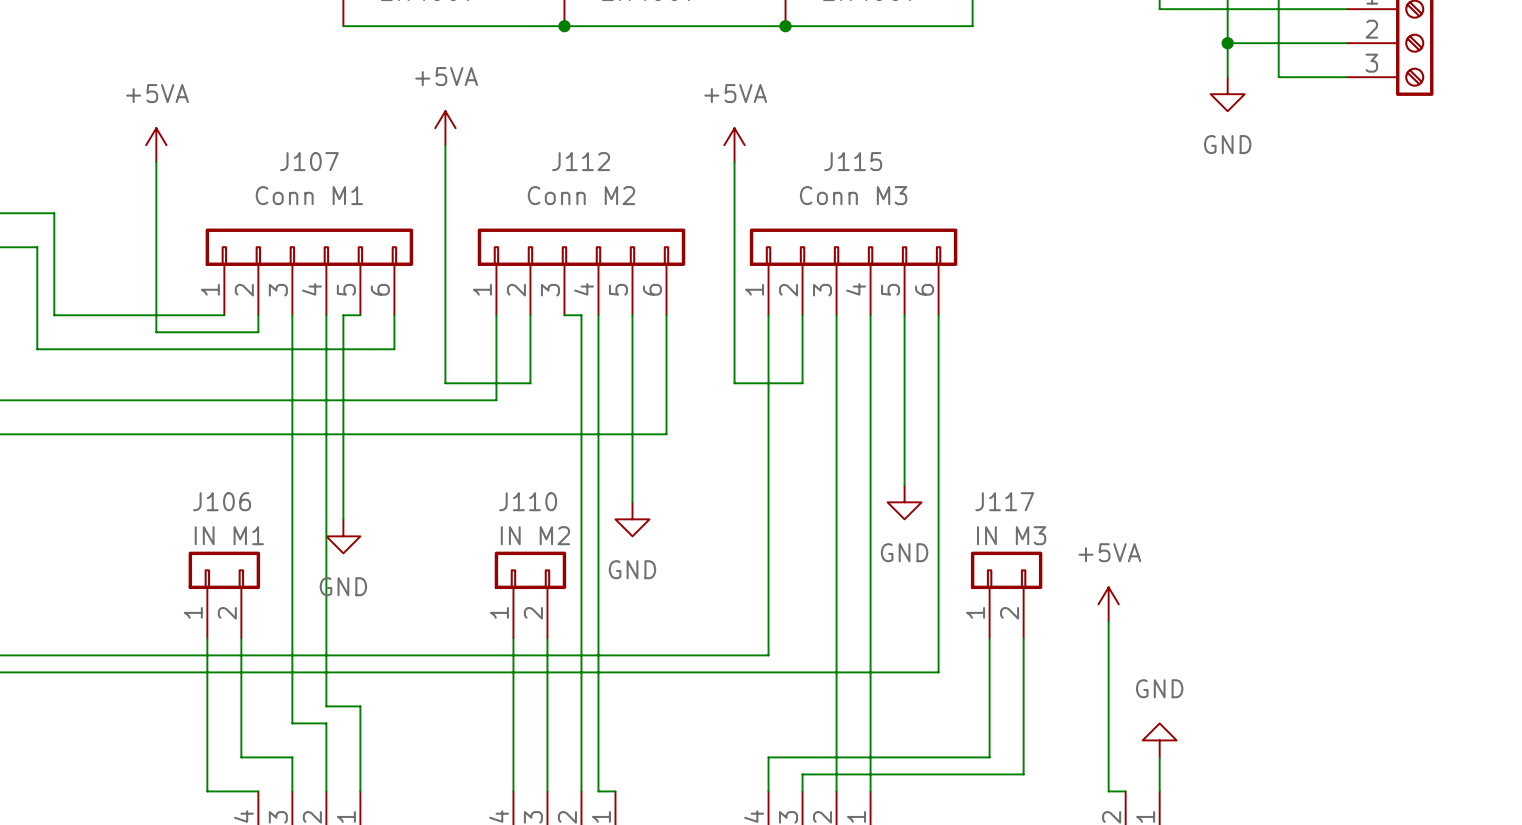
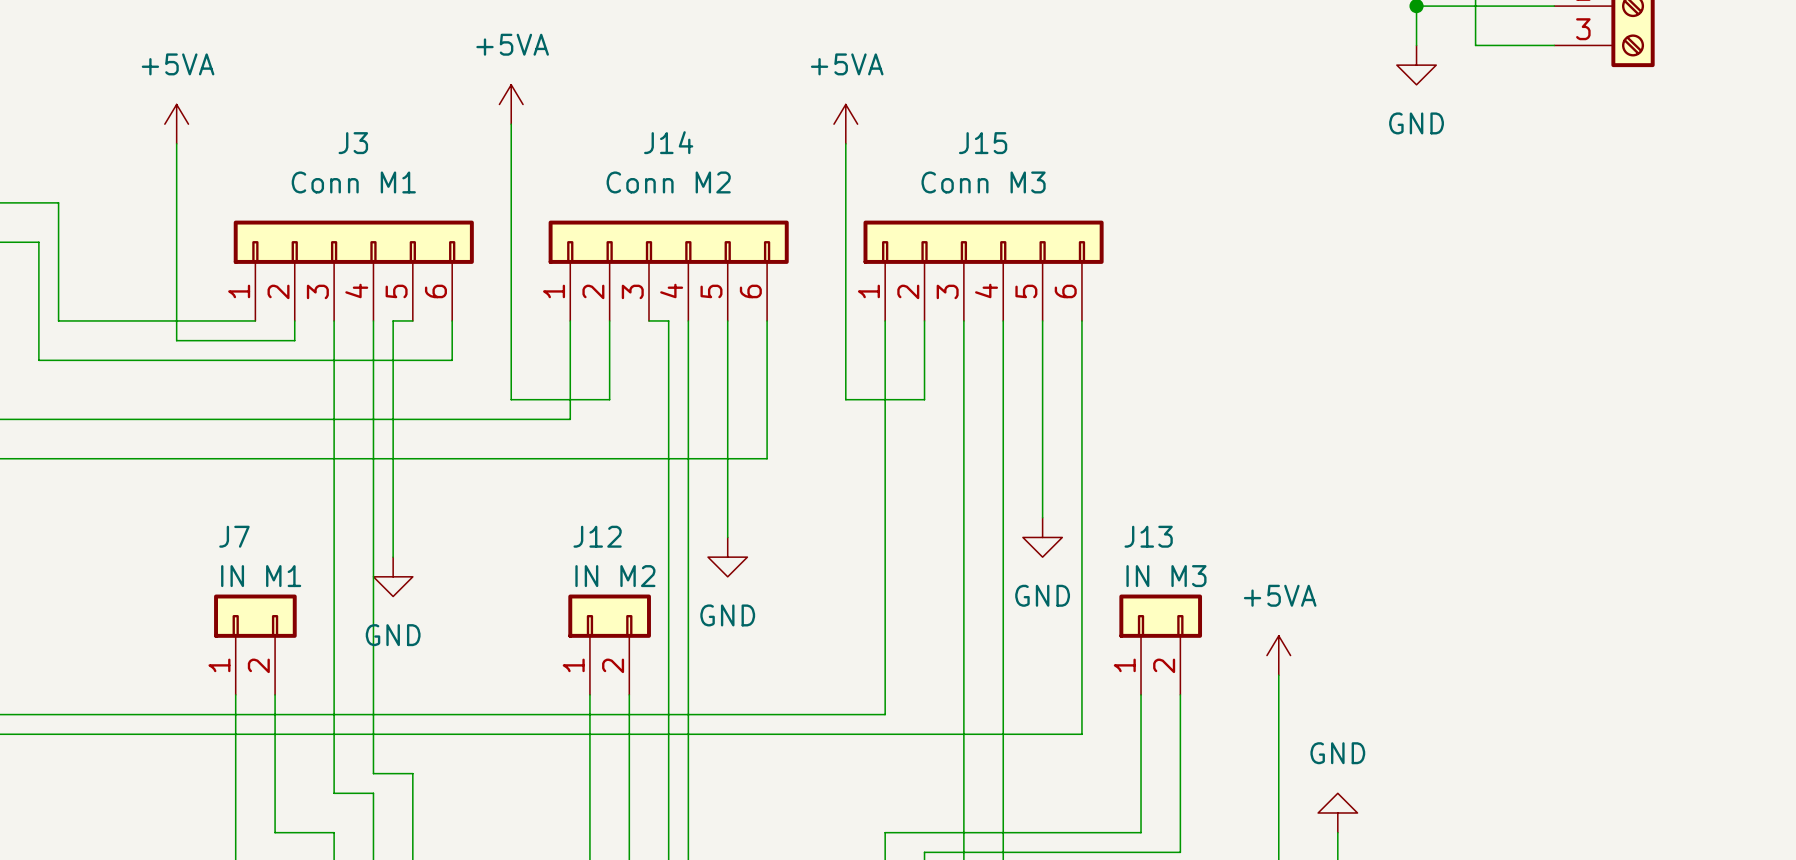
J107 name: J107 (309, 161) -> J3 (353, 143)
J112 name: J112 (581, 161) -> J14 (668, 142)
J115 name: J115 (853, 161) -> J15 (983, 143)
J106 name: J106 (222, 501) -> J7 (234, 536)
J110 name: J110 (528, 501) -> J12 (597, 536)
J117 name: J117 (1004, 501) -> J13 (1148, 536)

